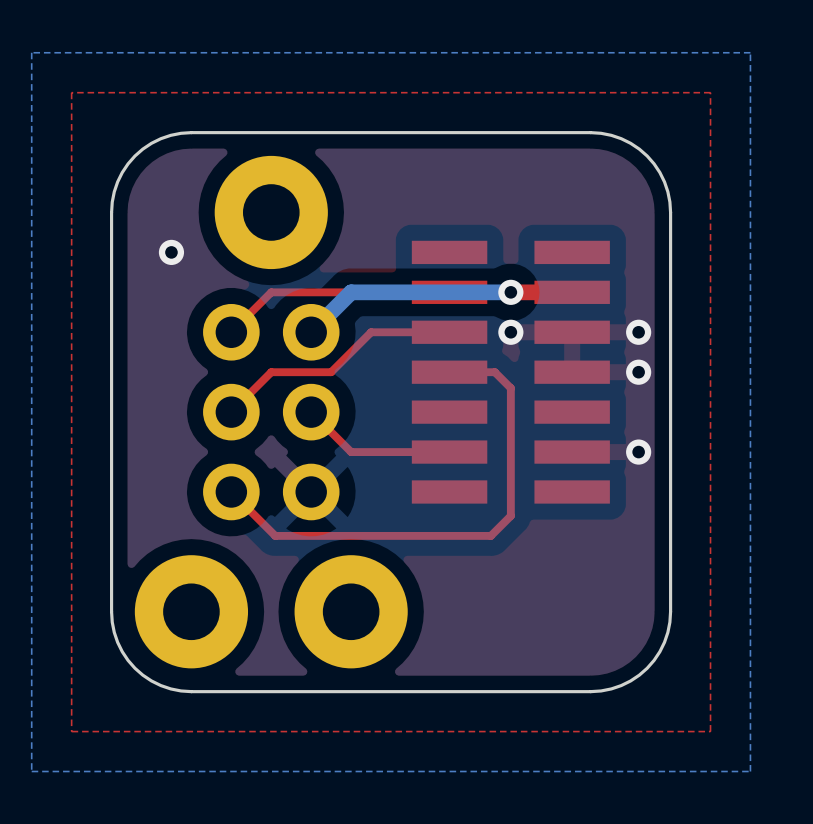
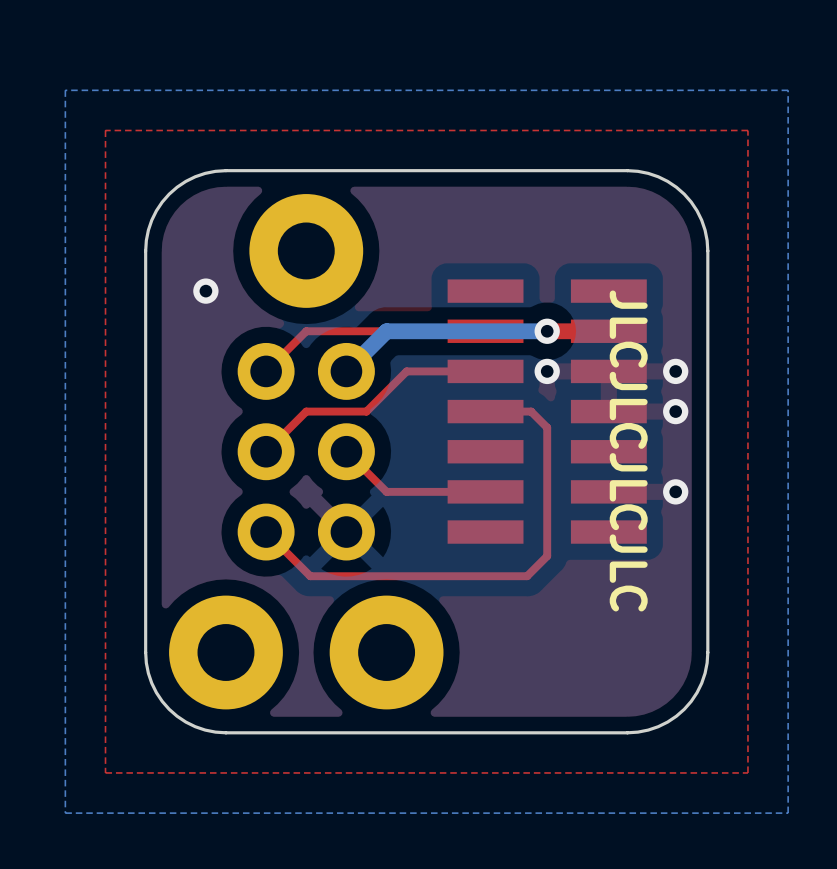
text: none -> JLCJLCJLCJLC (628, 450)

